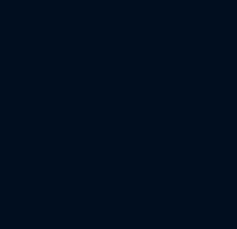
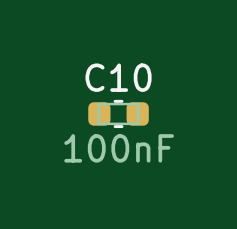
C10: none -> 100nF (118, 113)

